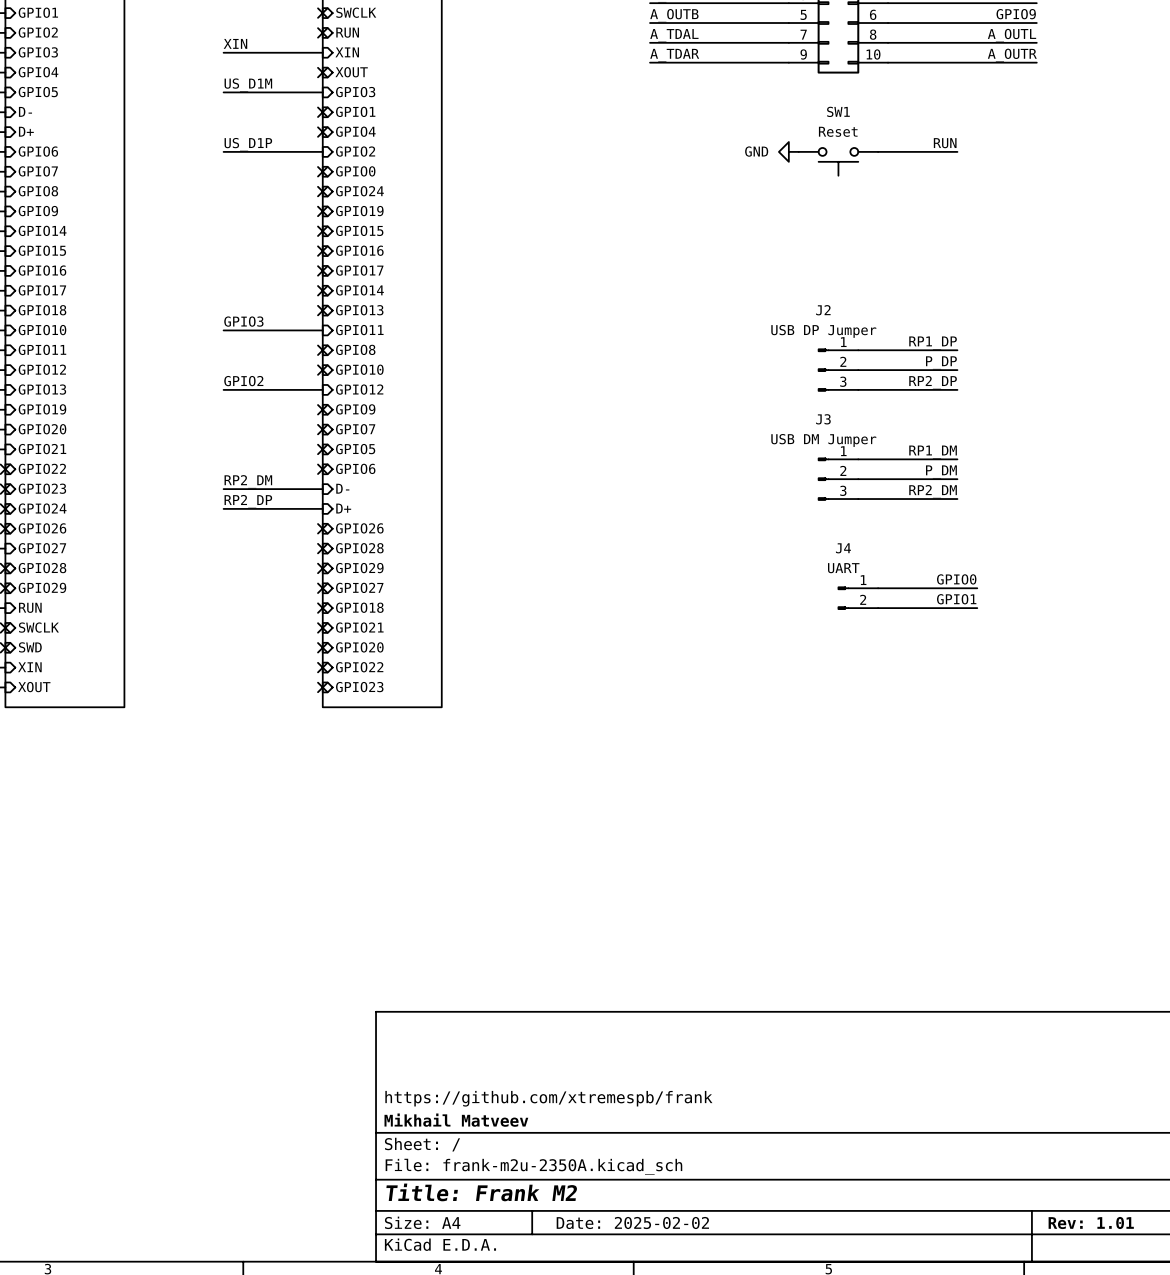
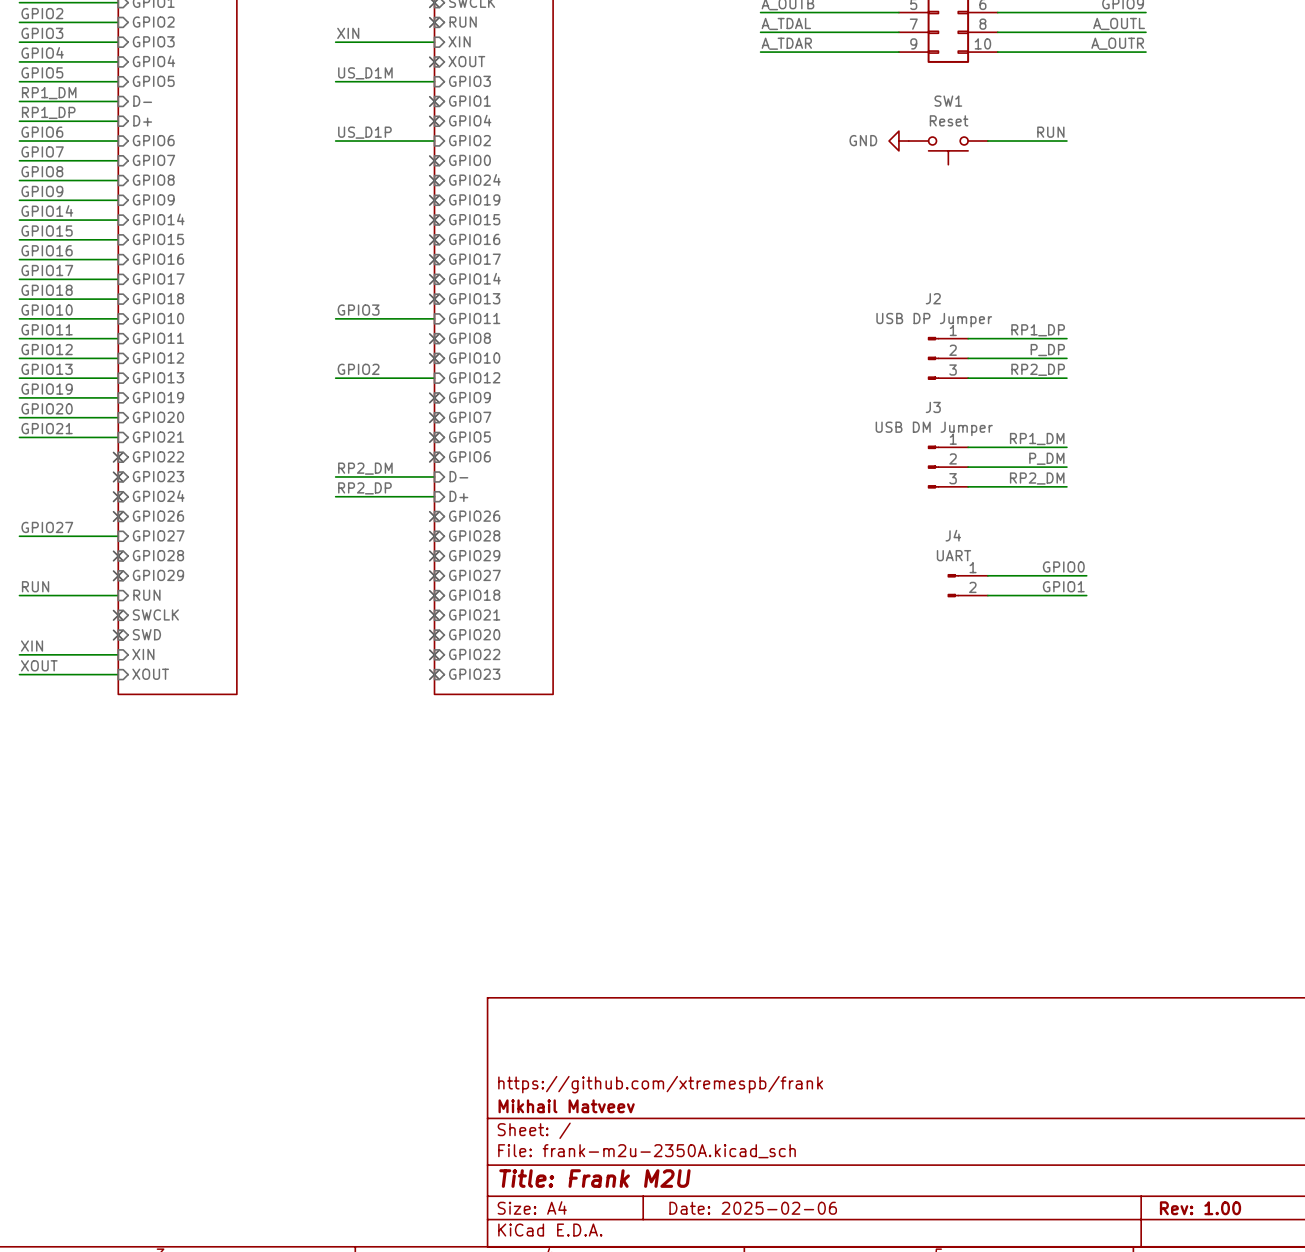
title block: Title: Frank M2 (481, 1192) -> Title: Frank M2U (594, 1178)
title block: Date: 2025-02-02 (632, 1222) -> Date: 2025-02-06 (753, 1208)
title block: Rev: 1.01 (1091, 1222) -> Rev: 1.00 (1200, 1208)

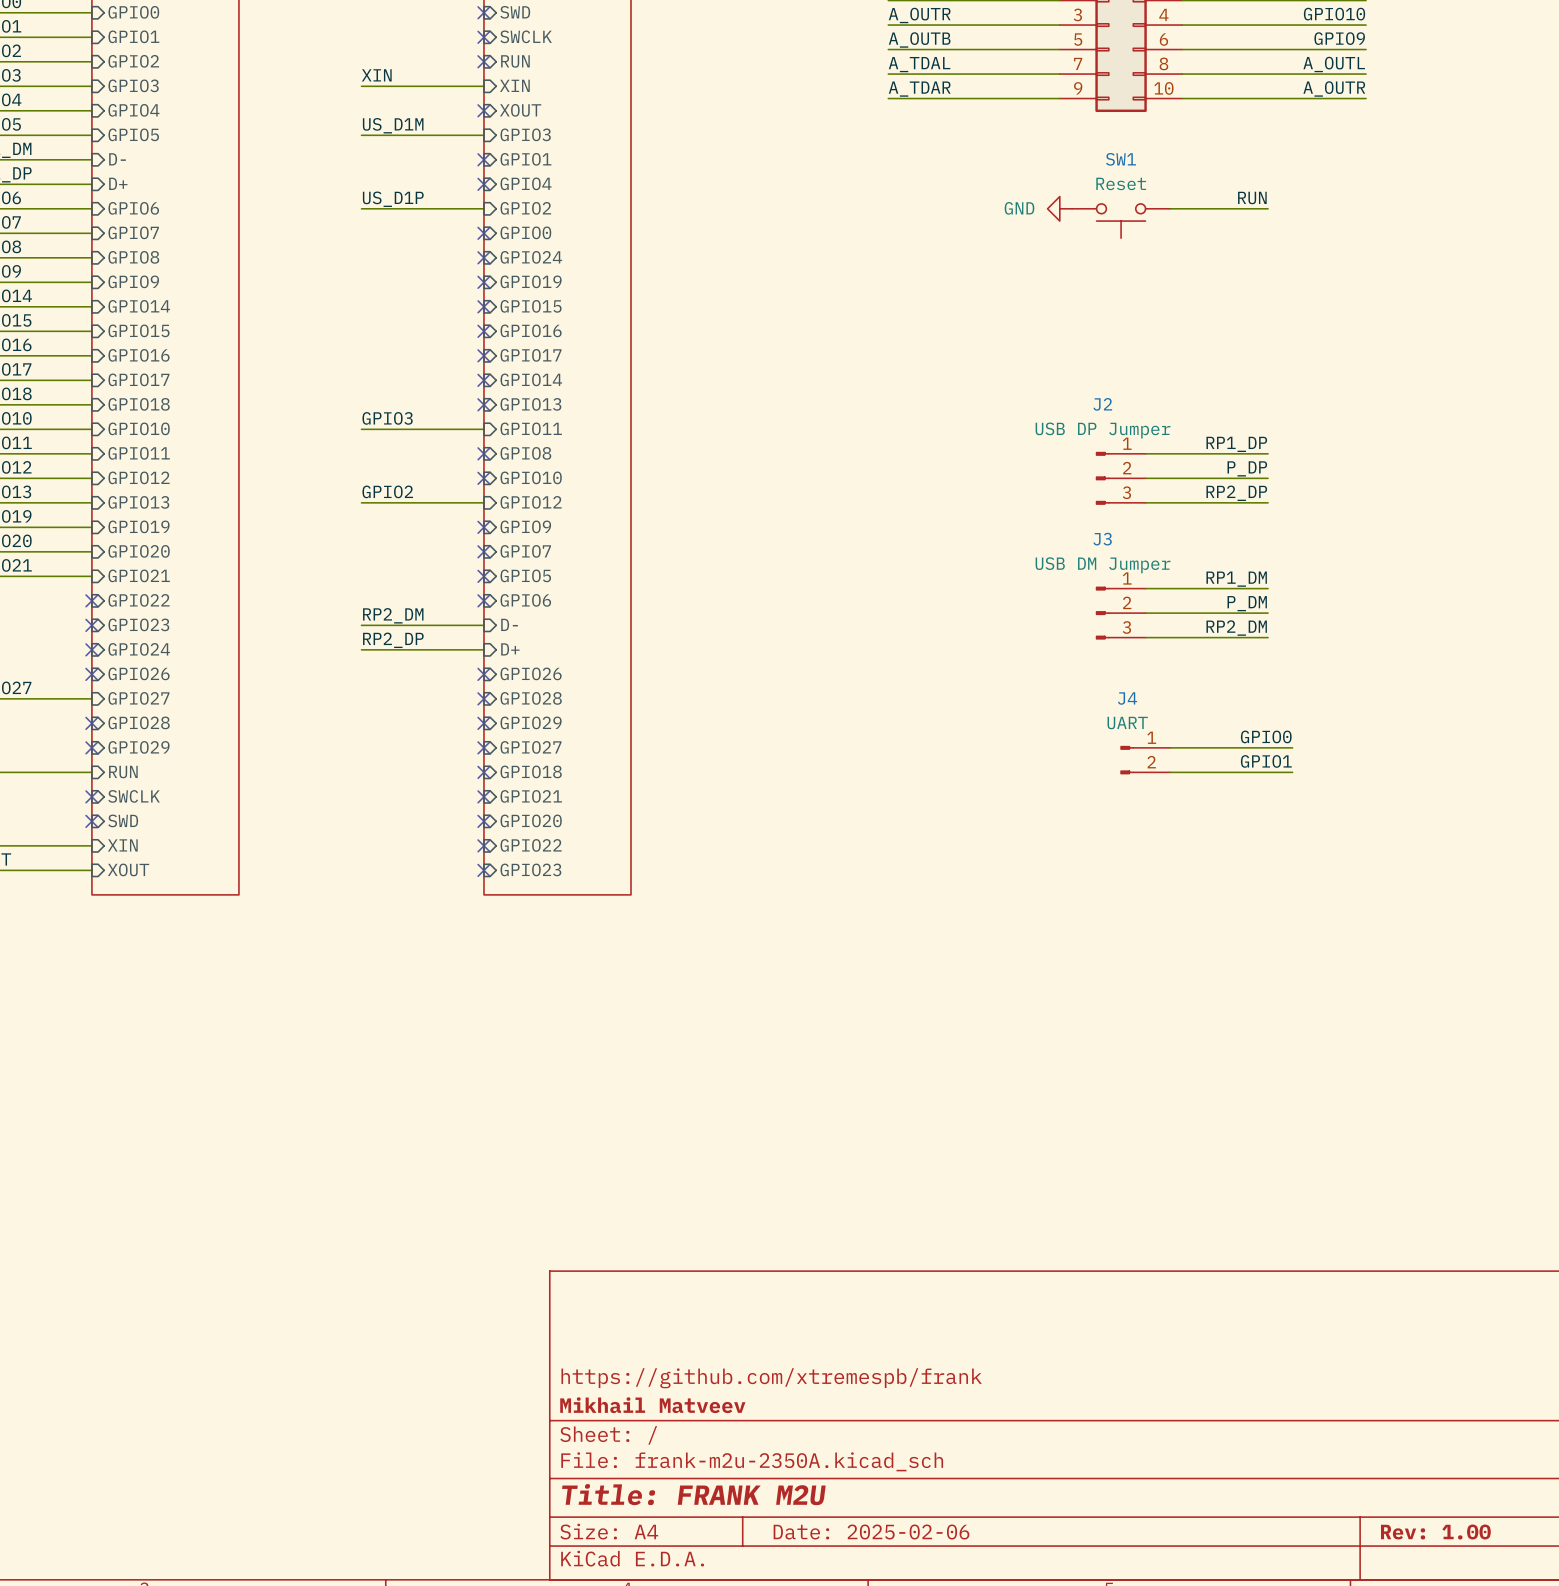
title block: Title: Frank M2U (594, 1178) -> Title: FRANK M2U (693, 1494)

